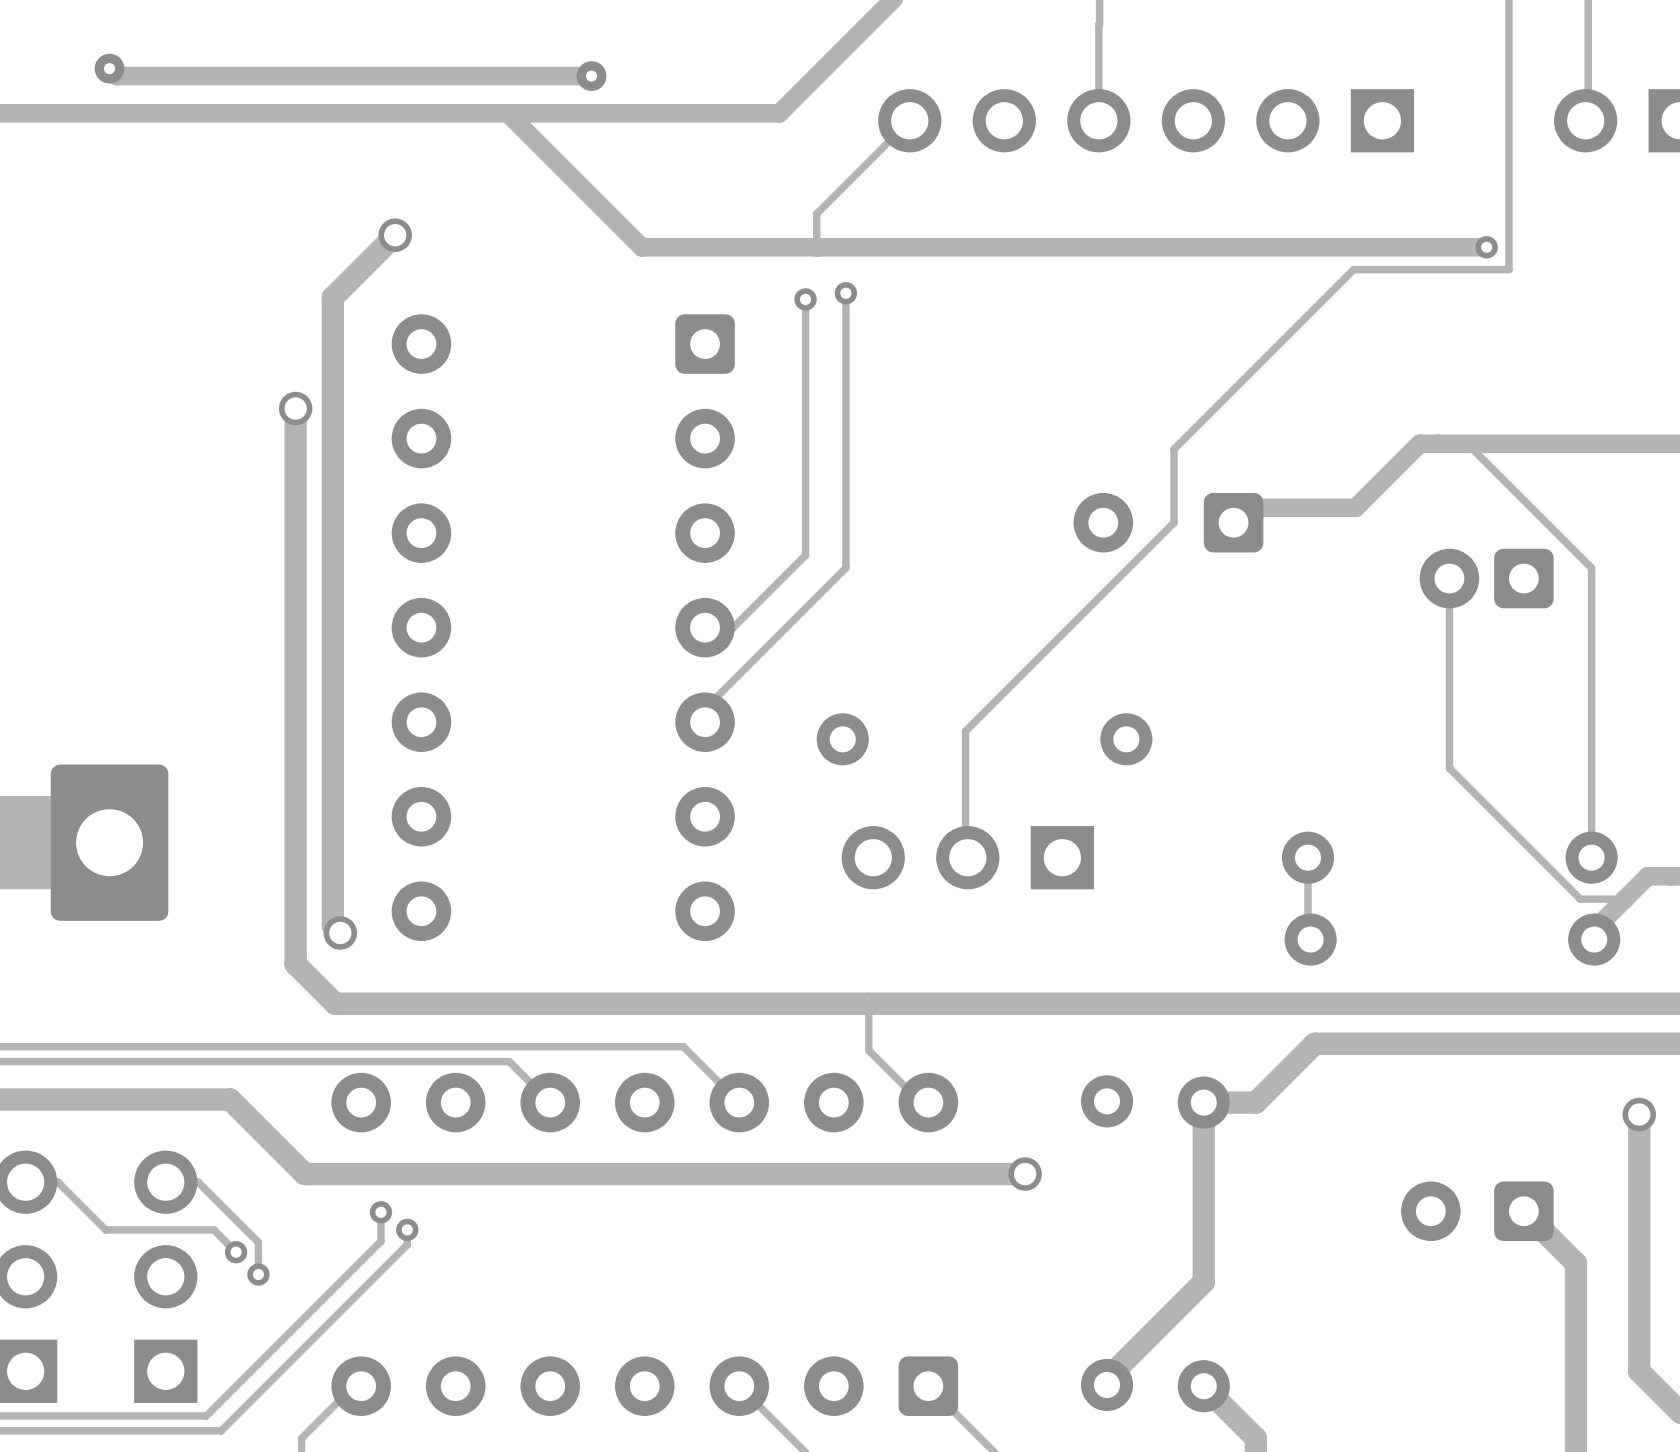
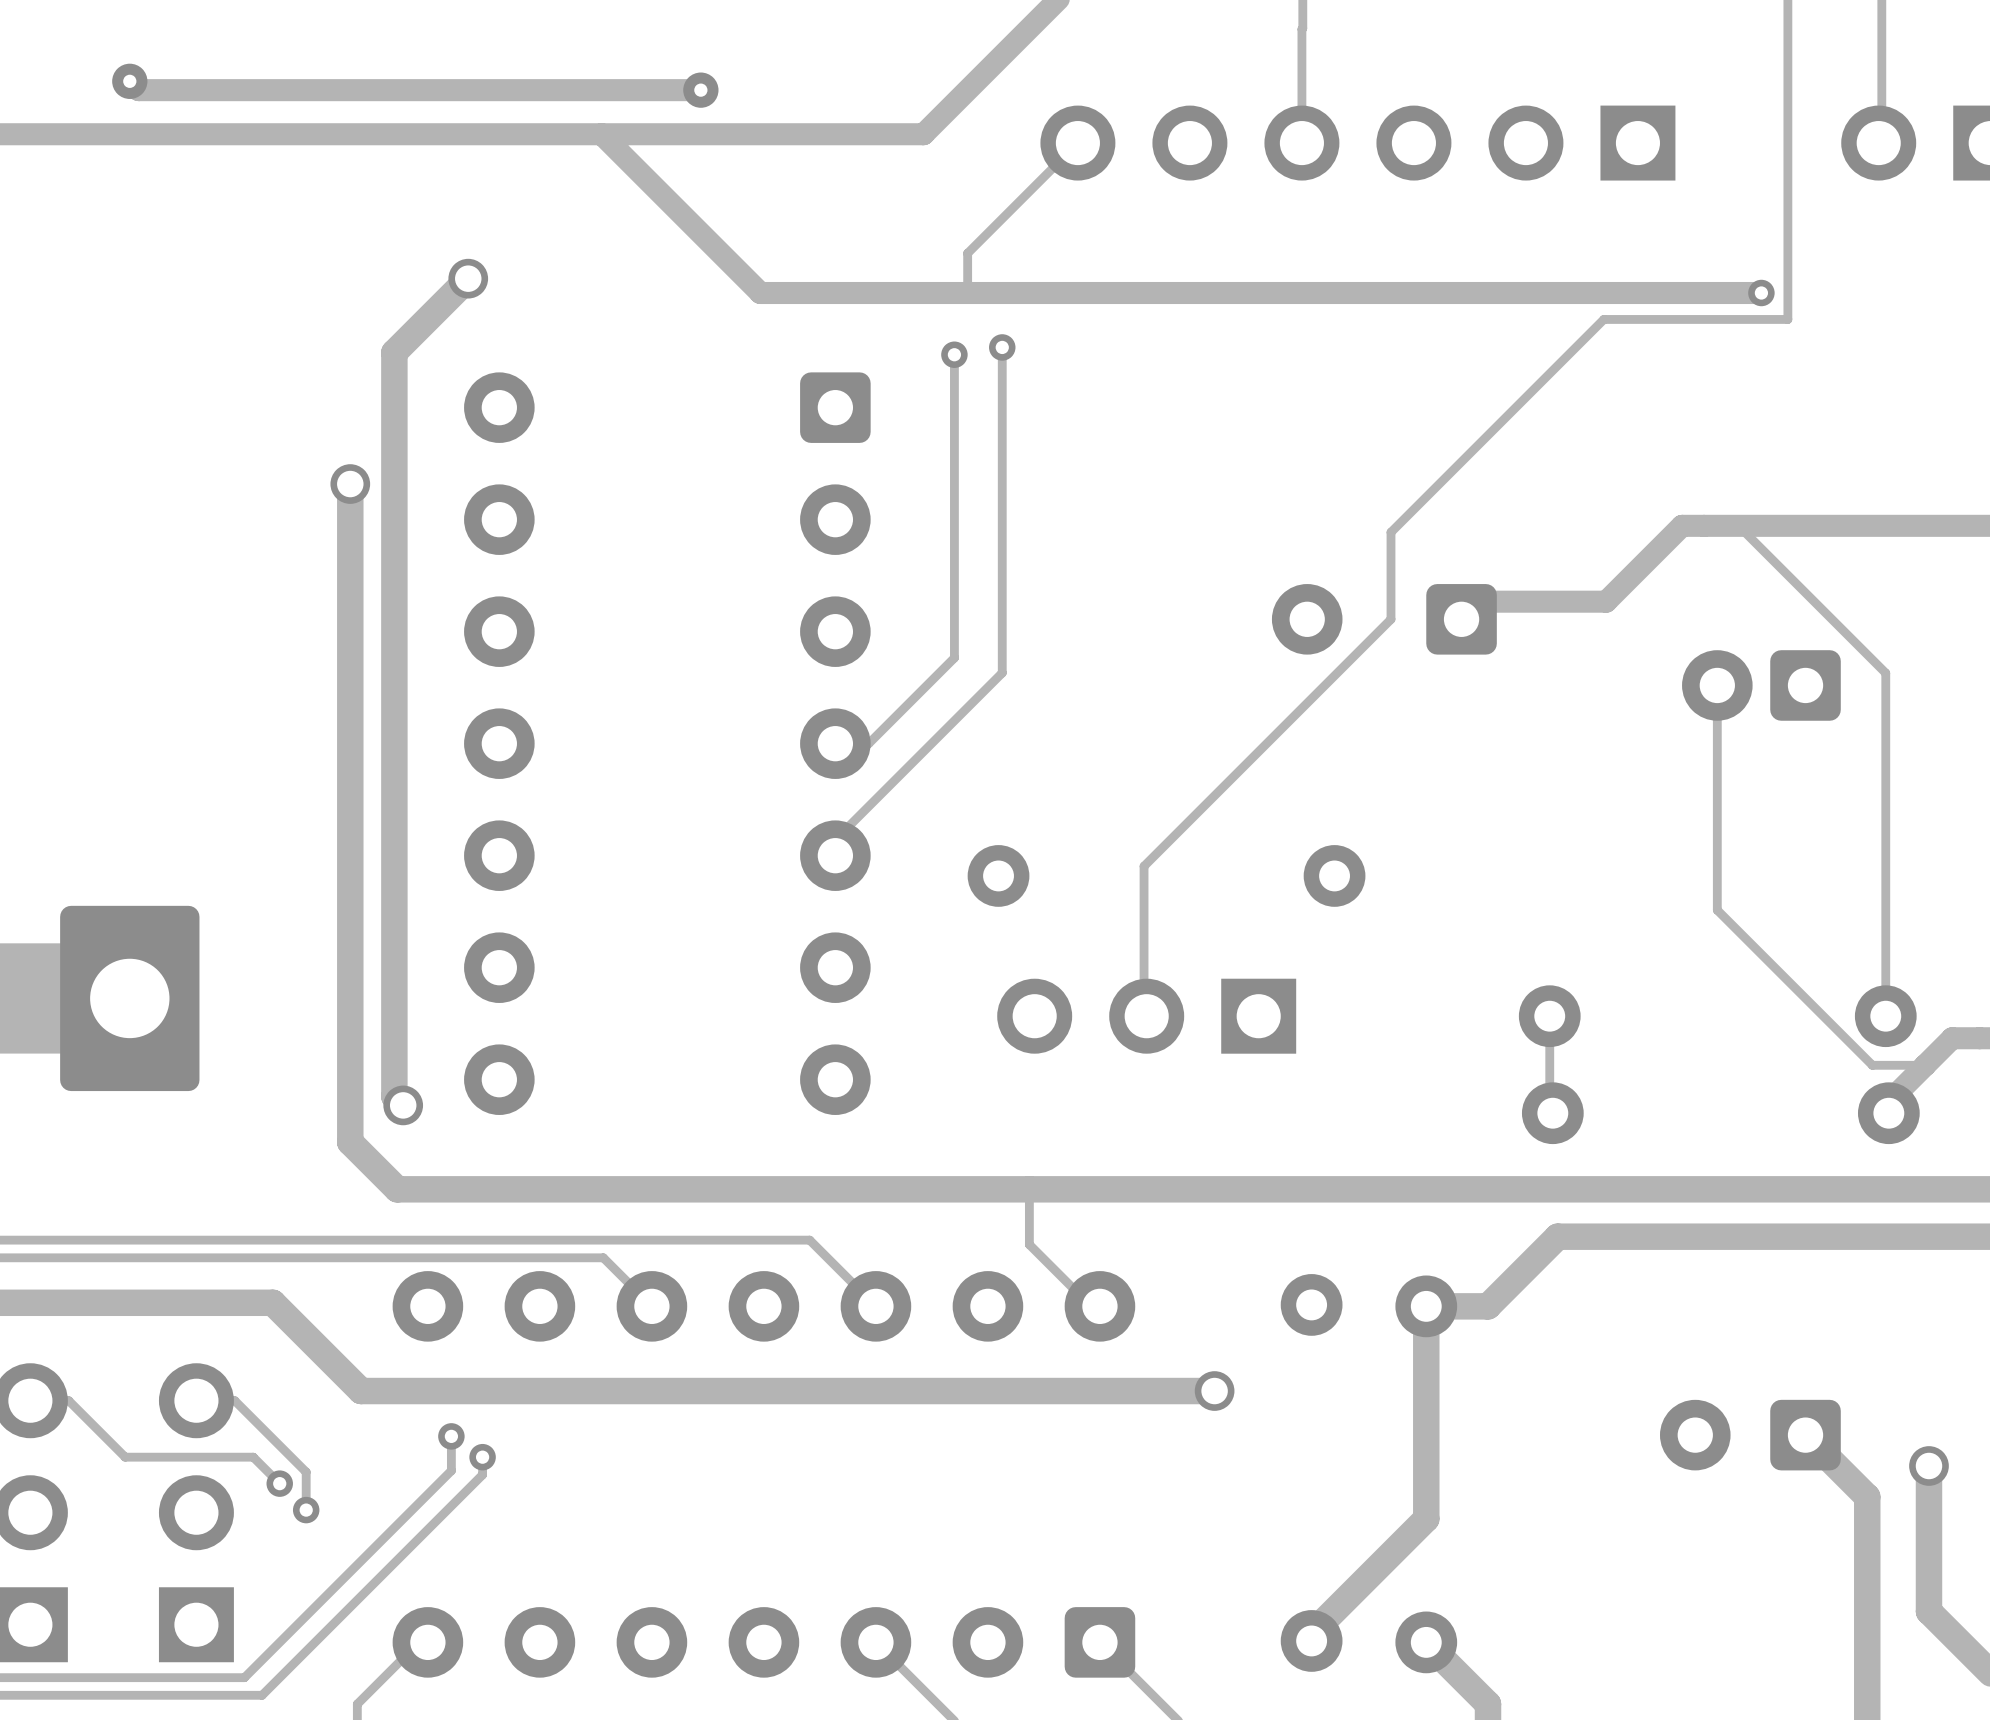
track: (1639, 1114) (1639, 1371) -> (1928, 1465) (1928, 1611) (1942, 1624)
via position: (1639, 1114) -> (1928, 1465)

